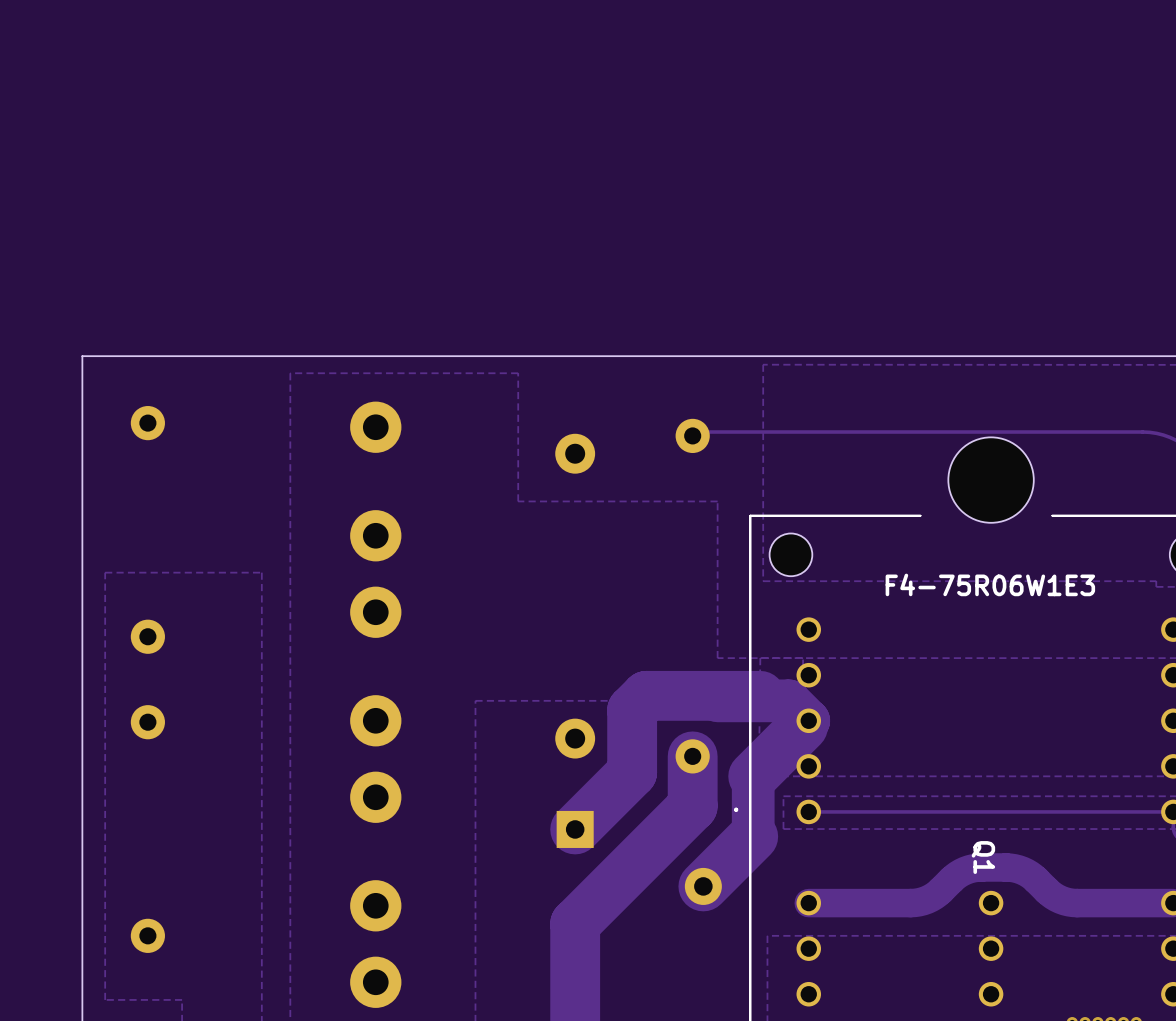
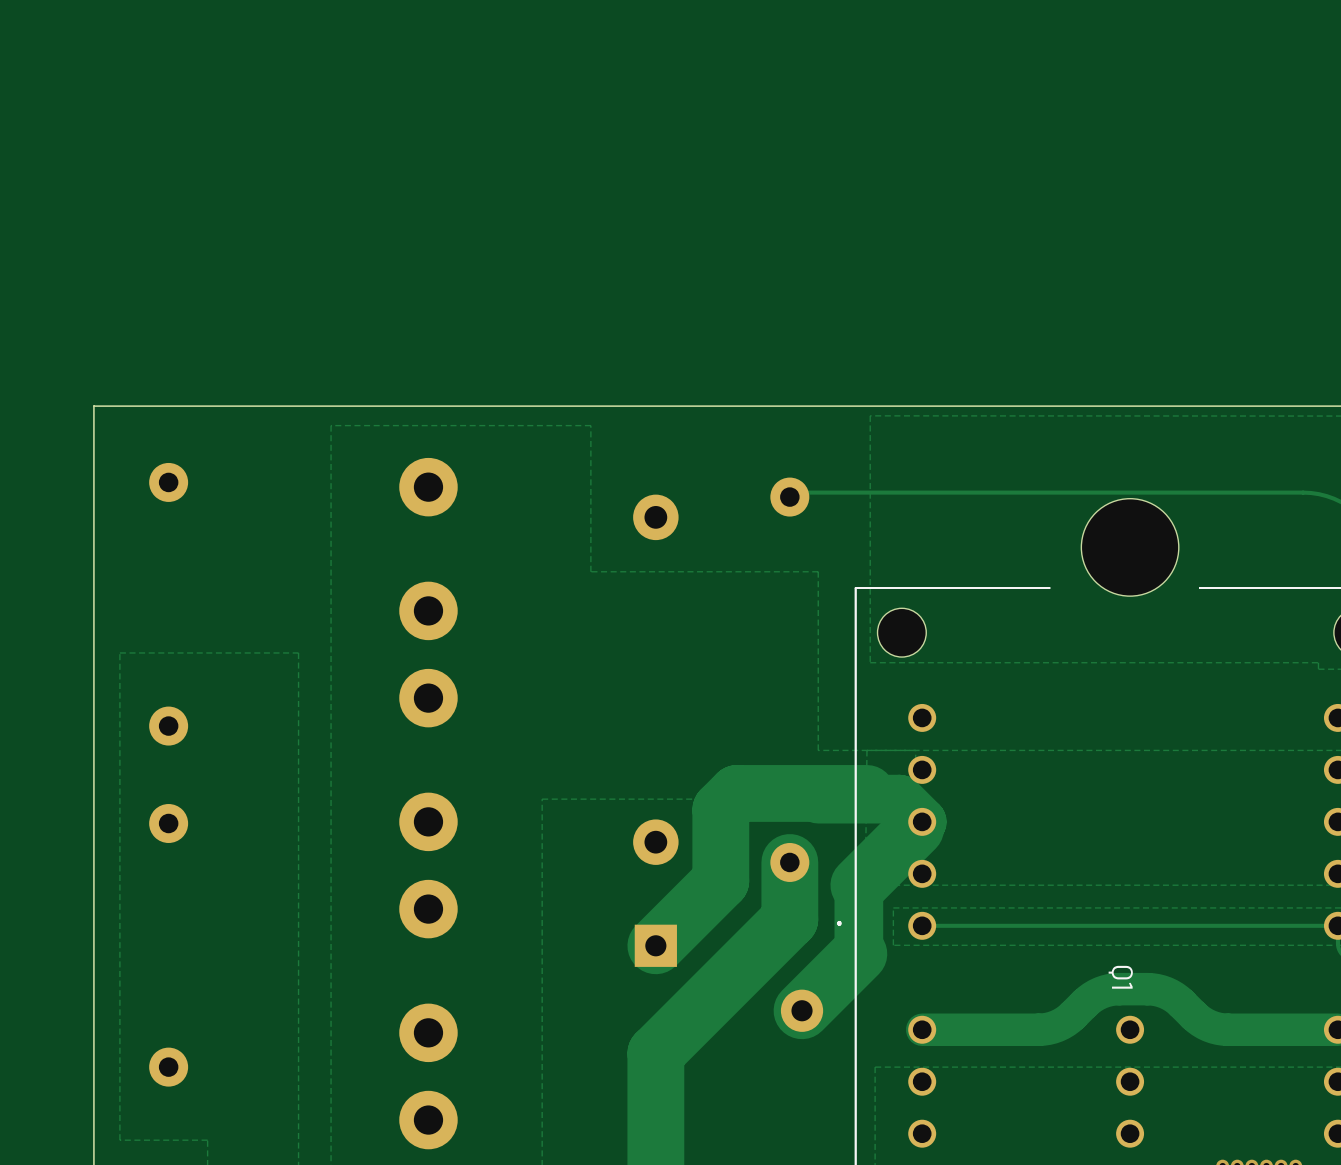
Q1 value: F4-75R06W1E3 (990, 584) -> none

